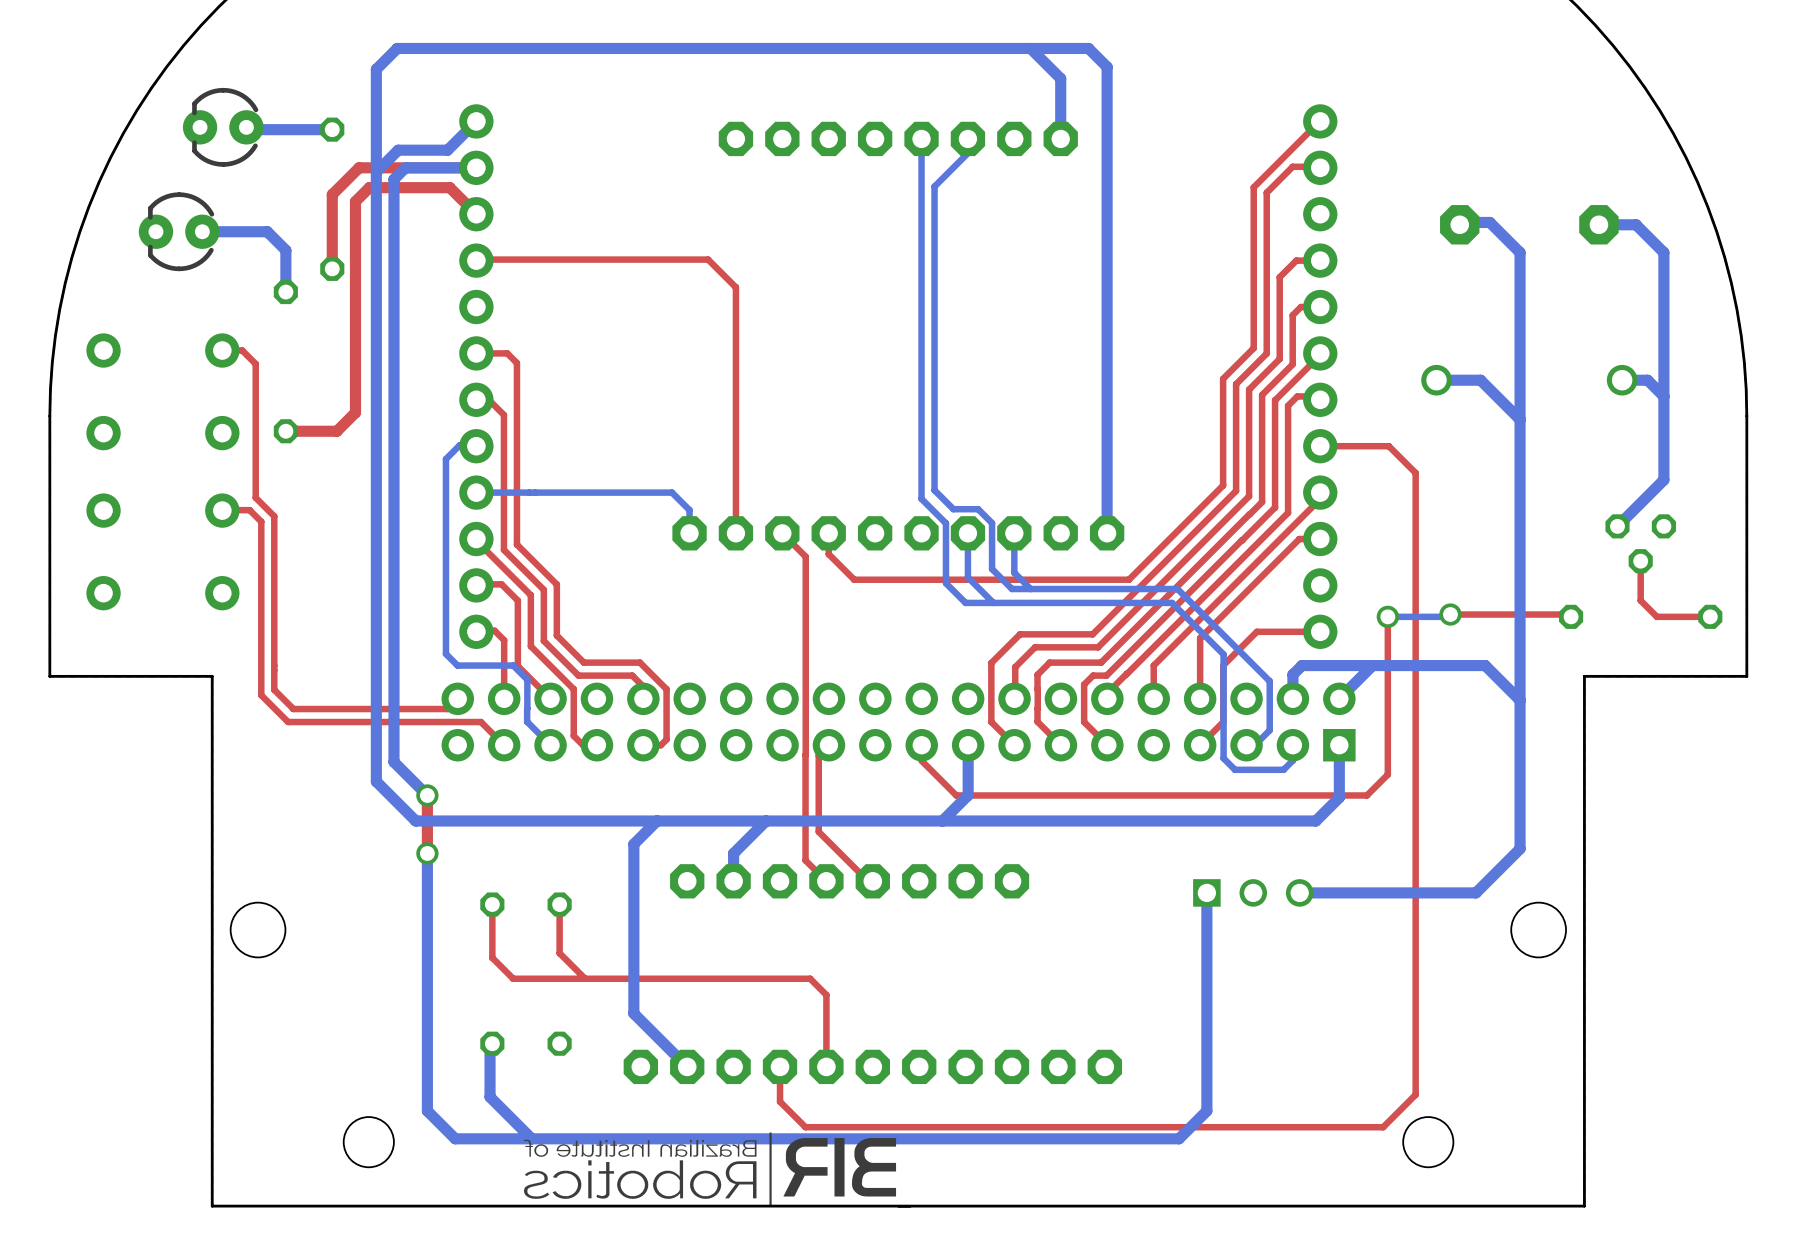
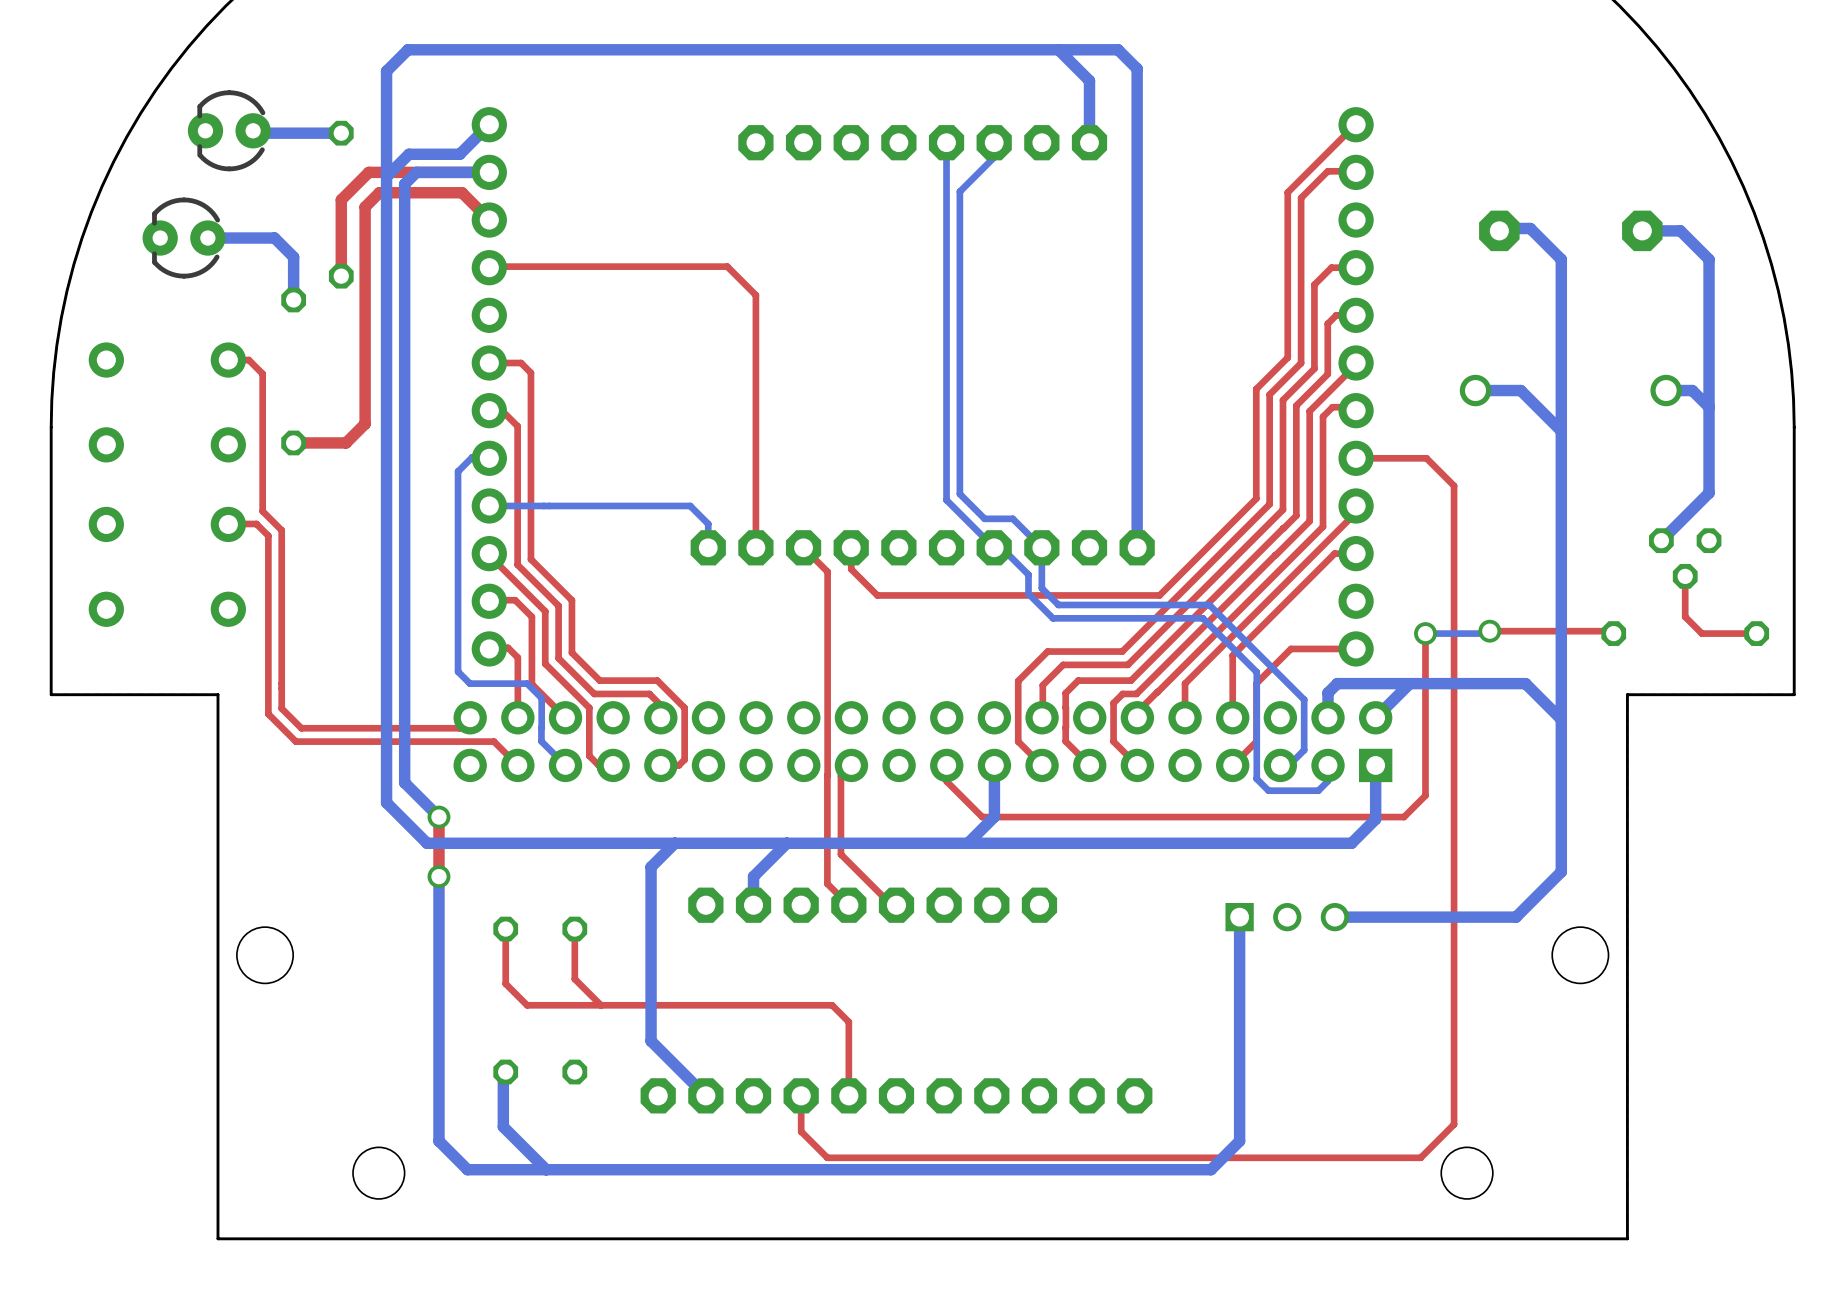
bottom track: (934, 480) (934, 490) (953, 509) (978, 509) (992, 523) (992, 569) (1012, 589) (1030, 589) -> (959, 494) (984, 518) (1012, 518) (1041, 547)
bottom track: (921, 486) (921, 498) (945, 523) (945, 583) (965, 602) (1172, 602) -> (946, 500) (994, 547) (1001, 547) (1028, 574) (1028, 593) (1053, 618) (1203, 619)
bottom track: (967, 533) (967, 577) (993, 602) -> none
drawing: [523, 1132, 897, 1206] -> none

